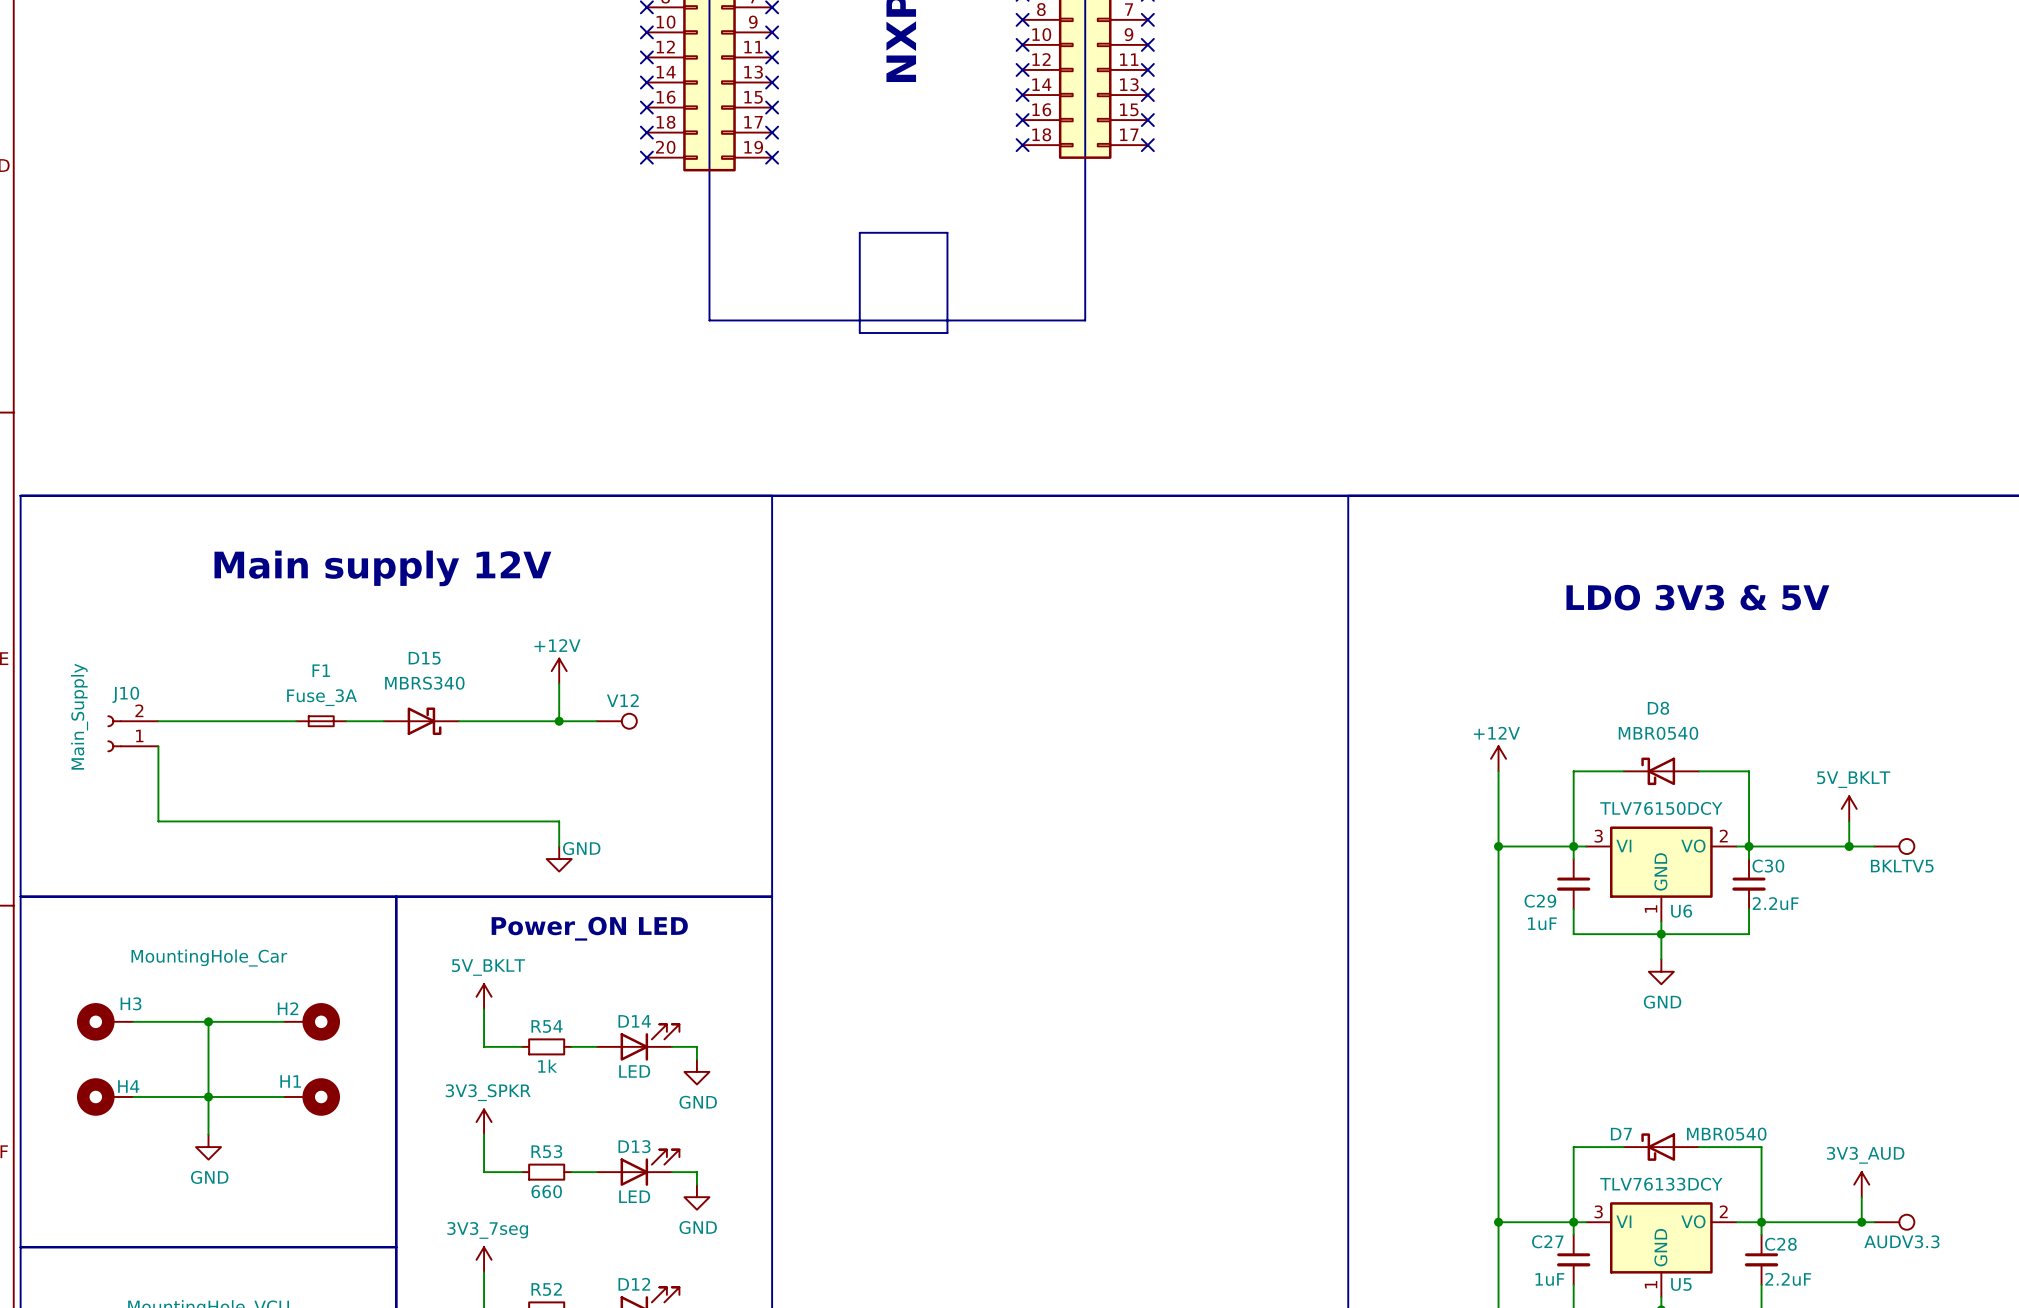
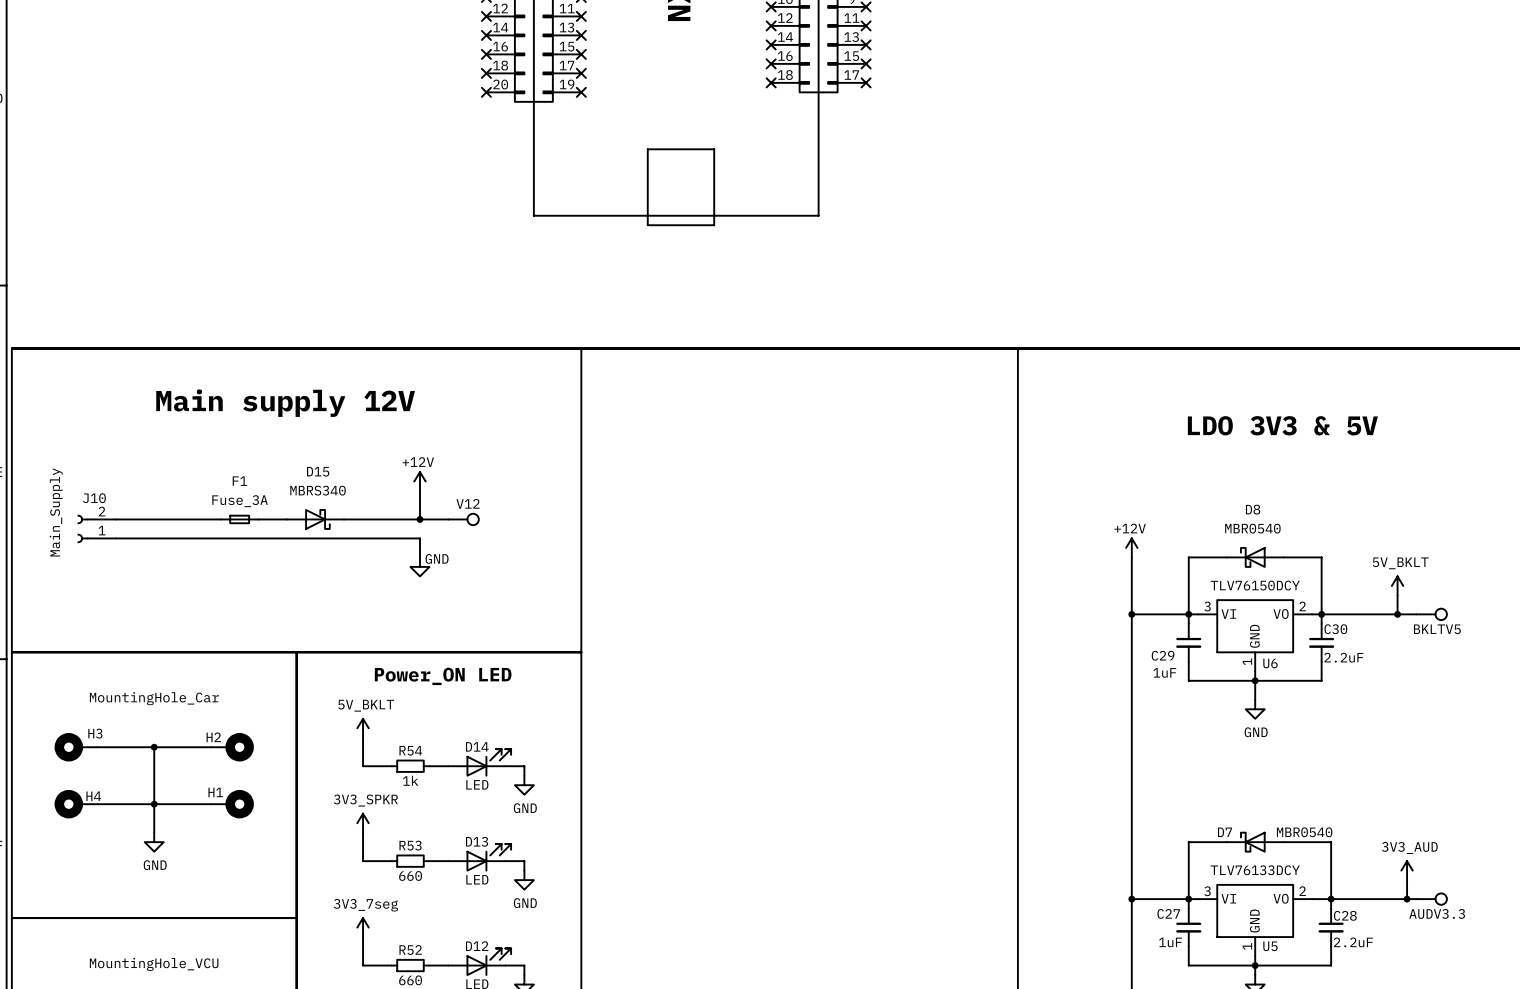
wire: (158, 746) (158, 821) (559, 821) (559, 846) -> (116, 538) (419, 538) (419, 557)
power symbol position: GND (559, 859) -> GND (419, 566)

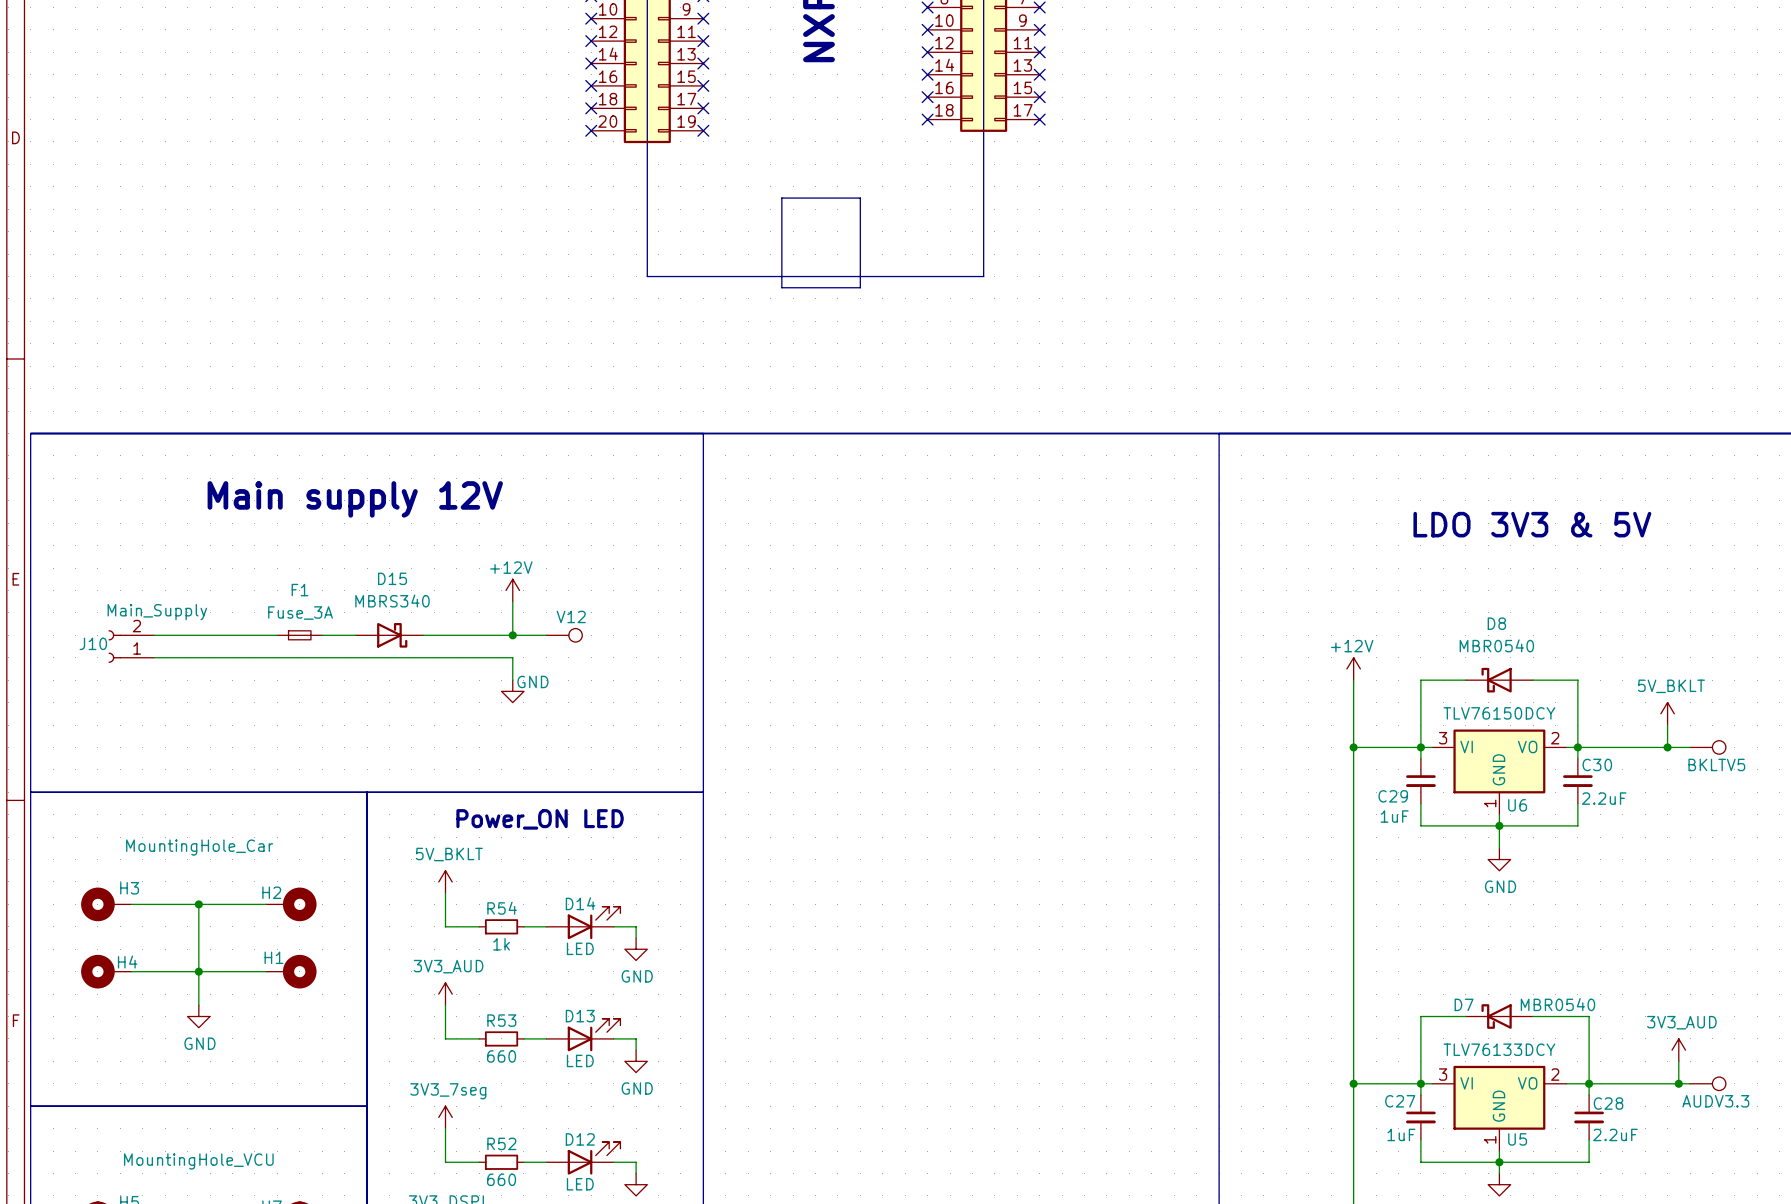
J10 name position: J10 (94, 498) -> J10 (93, 643)
J10 value rotation: 0° (56, 512) -> 90° clockwise (157, 612)
power symbol: 3V3_SPKR (363, 823) -> 3V3_AUD (445, 994)

